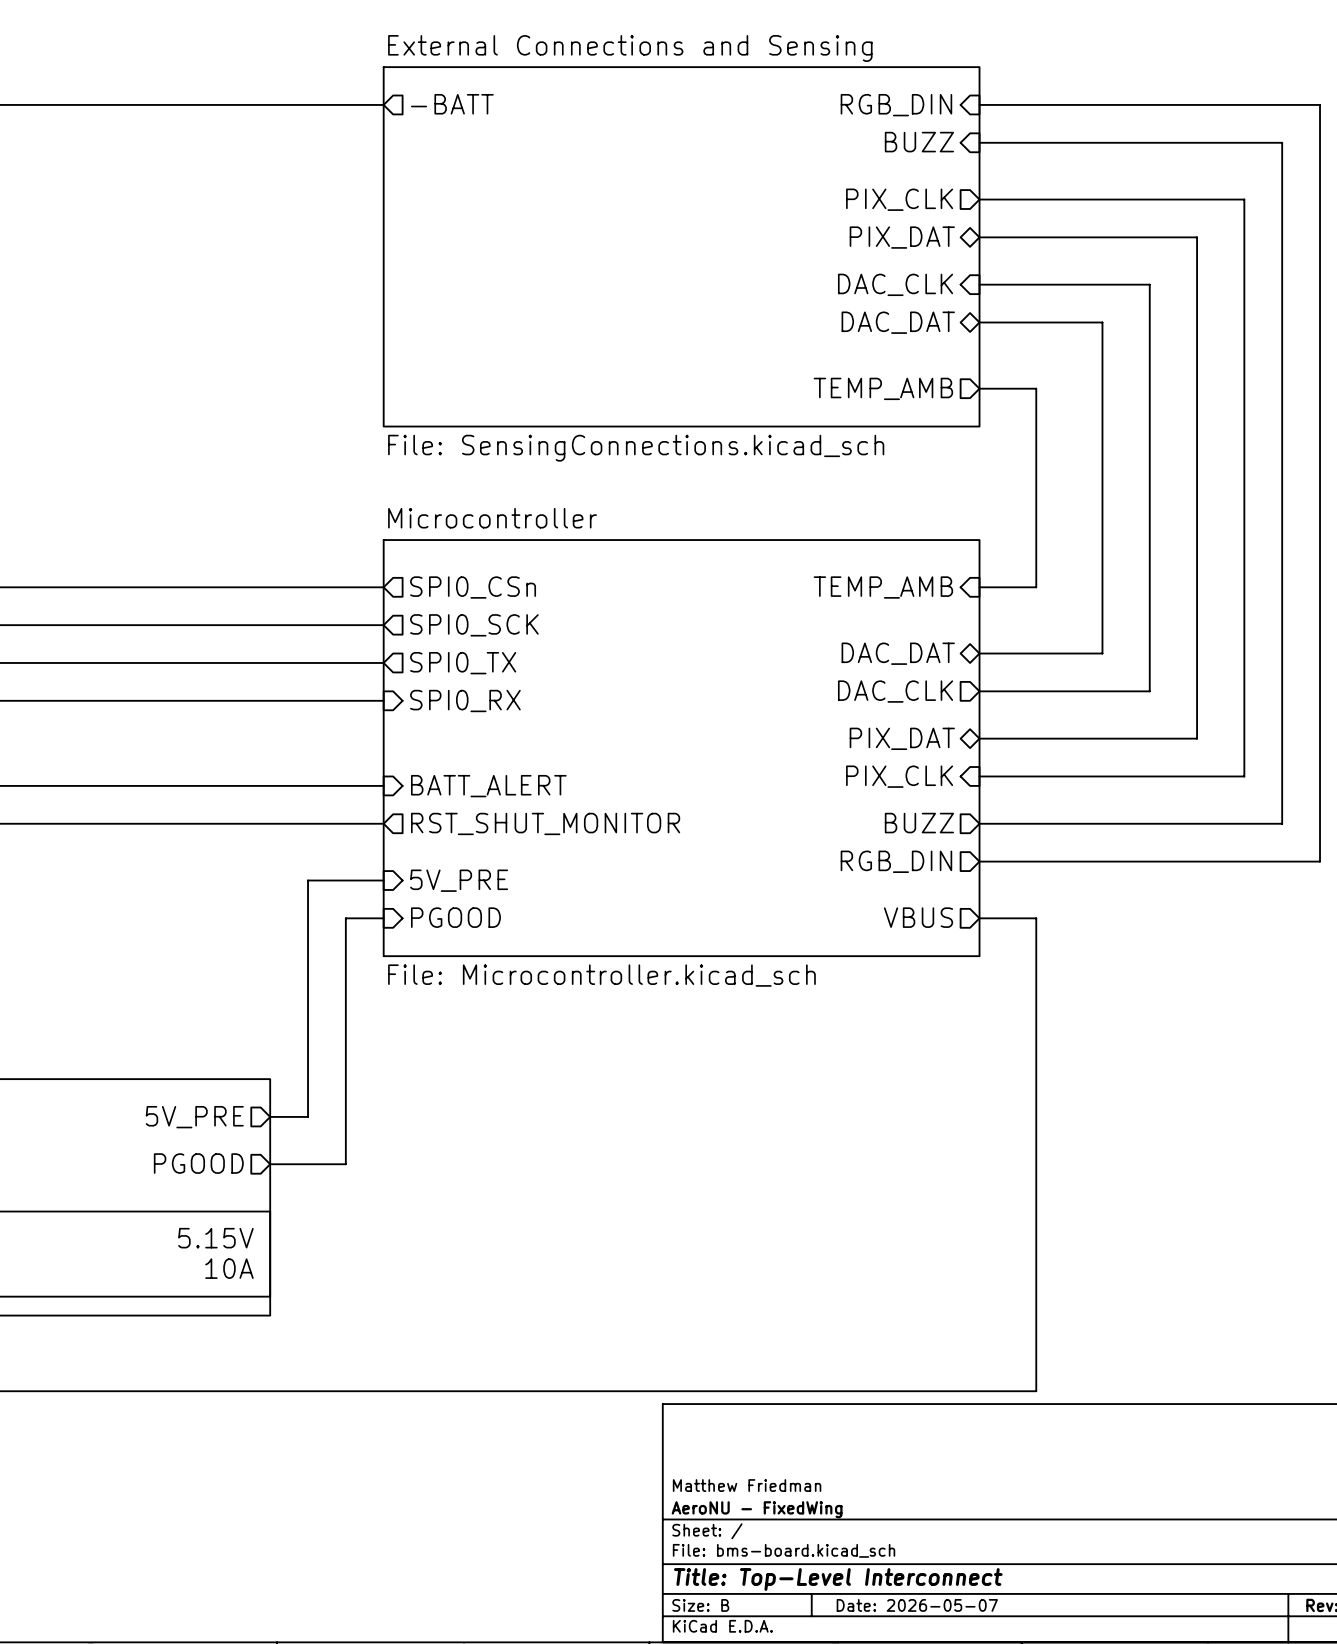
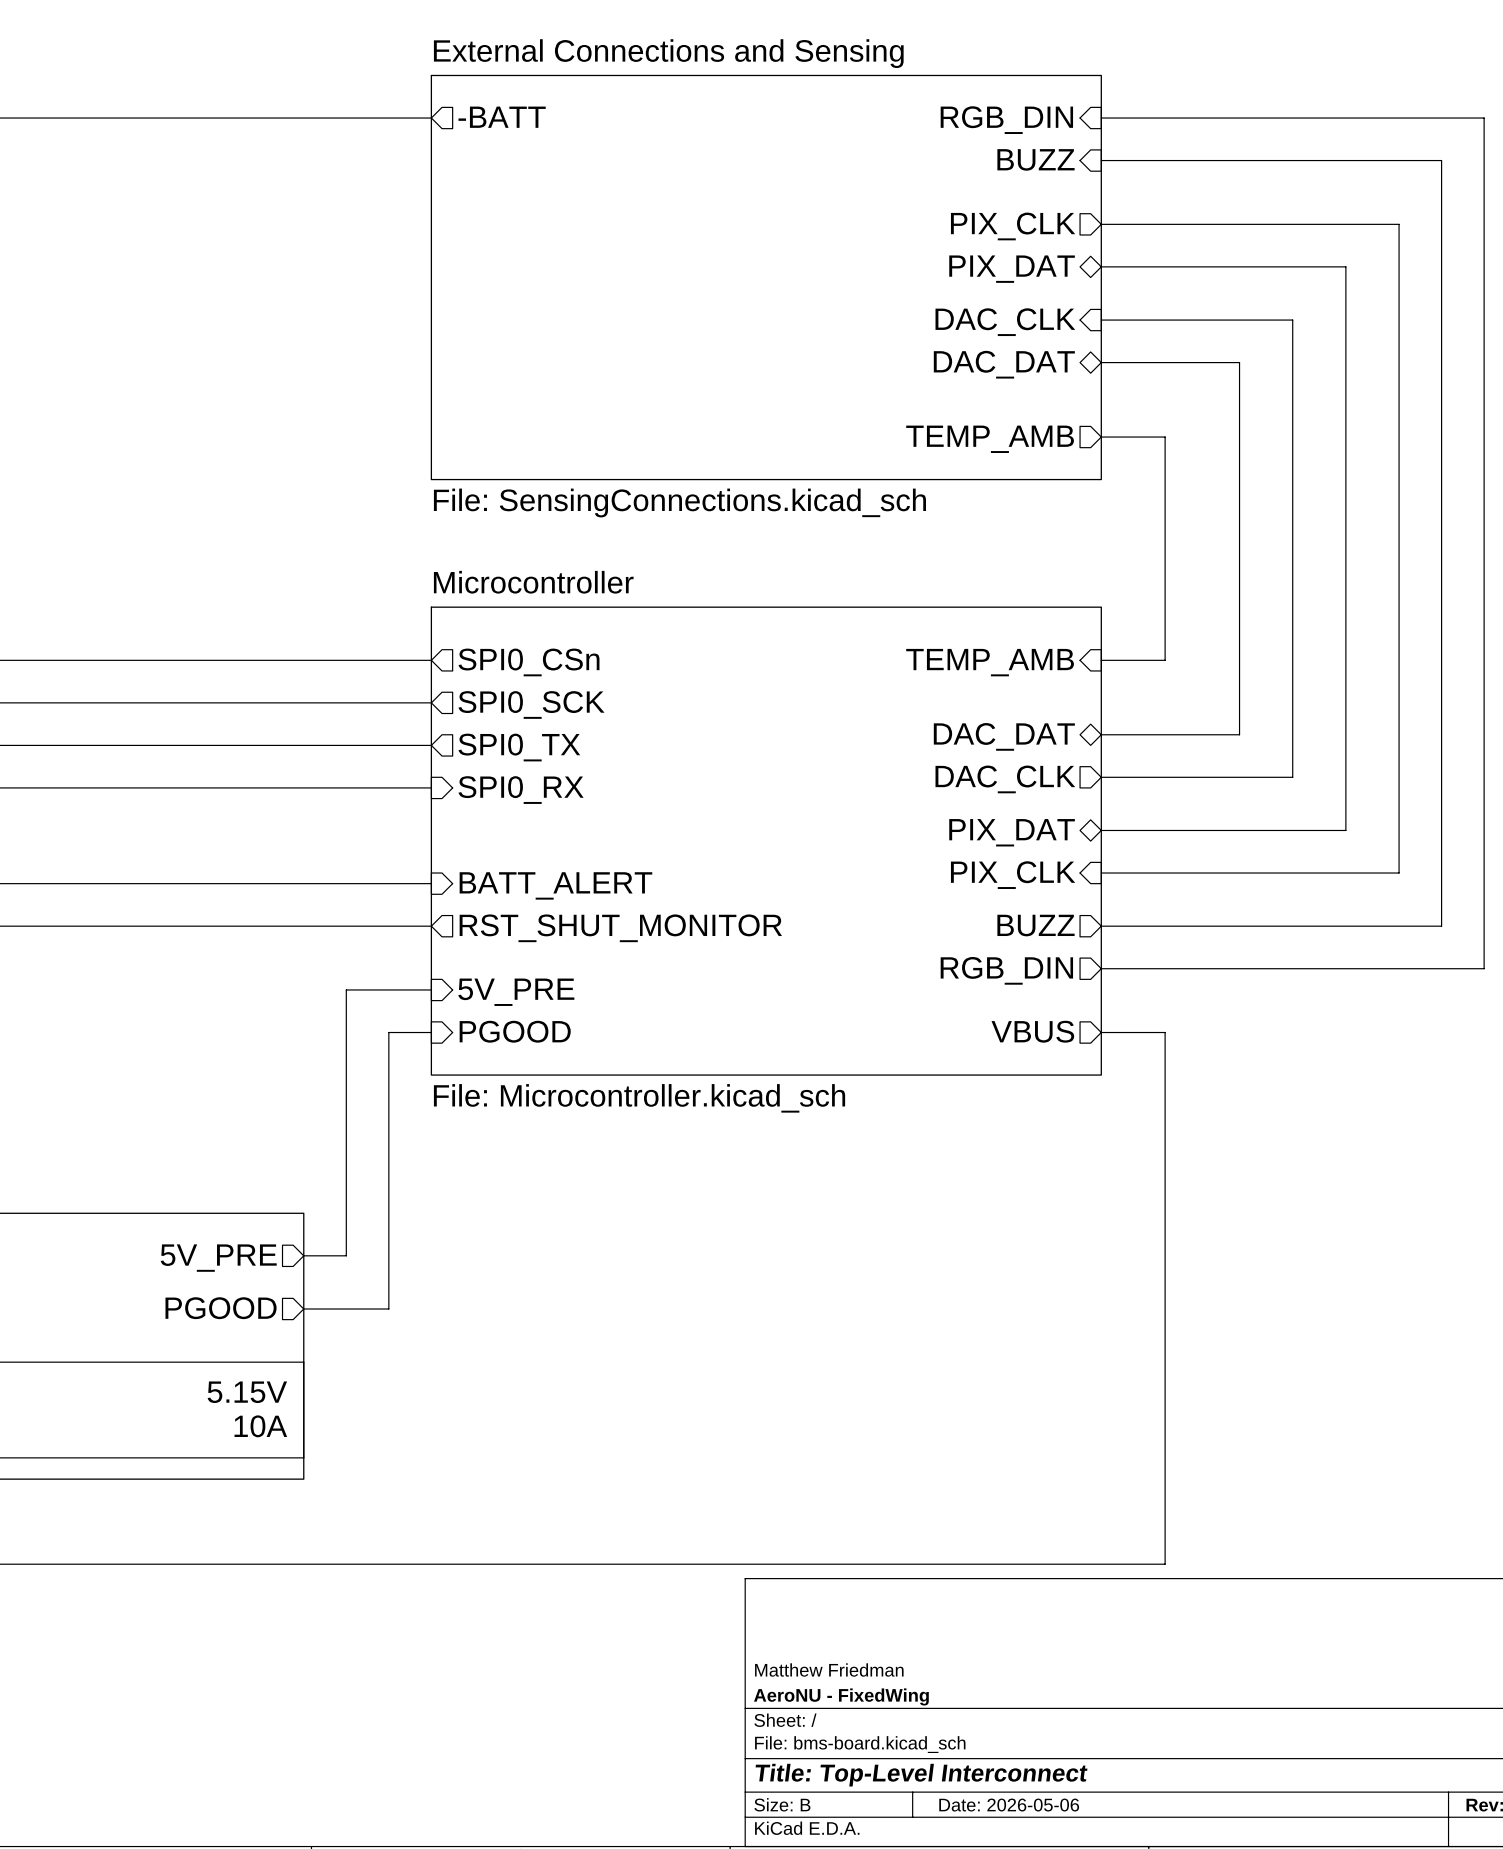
title block: Date: 2026-05-07 (917, 1605) -> Date: 2026-05-06 (1009, 1805)

